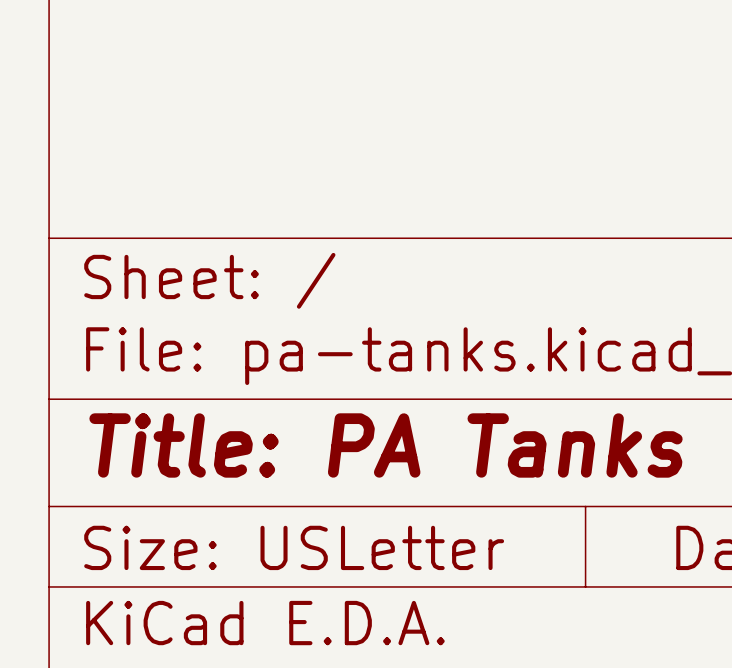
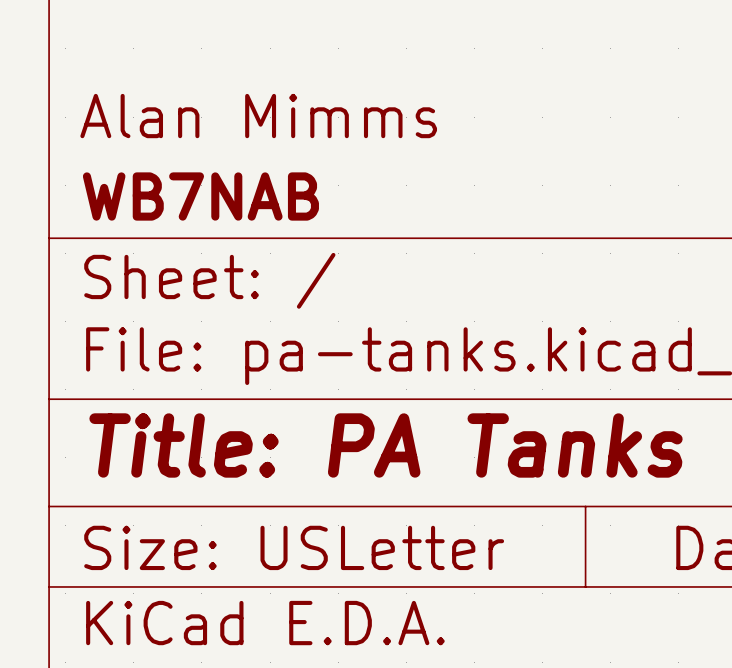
title block: none -> Alan Mimms (258, 116)
title block: none -> WB7NAB (200, 196)

